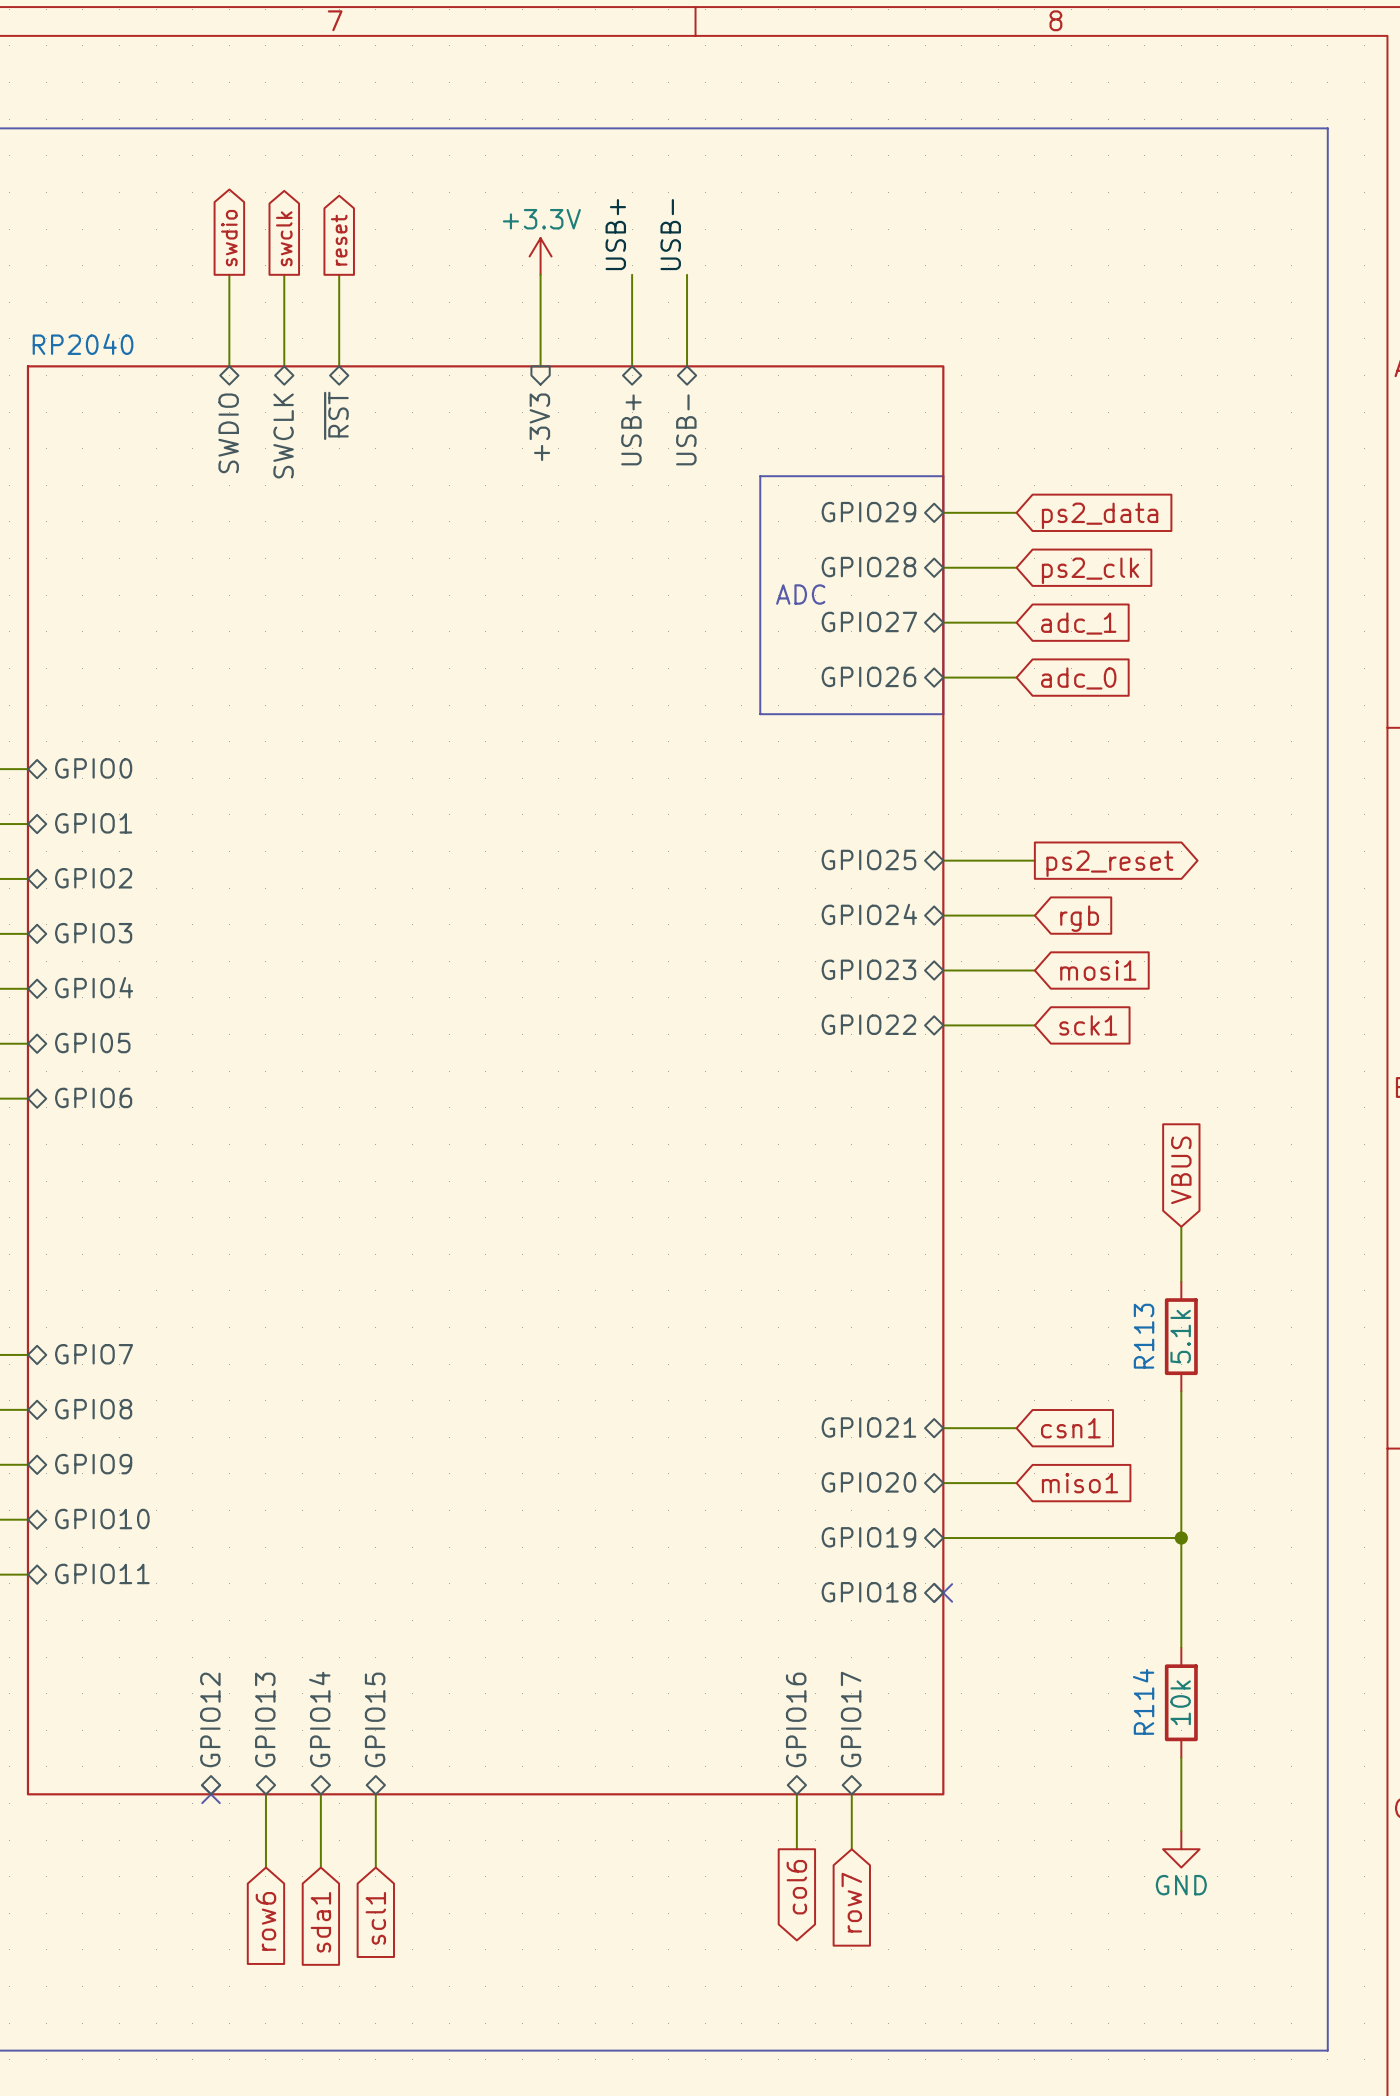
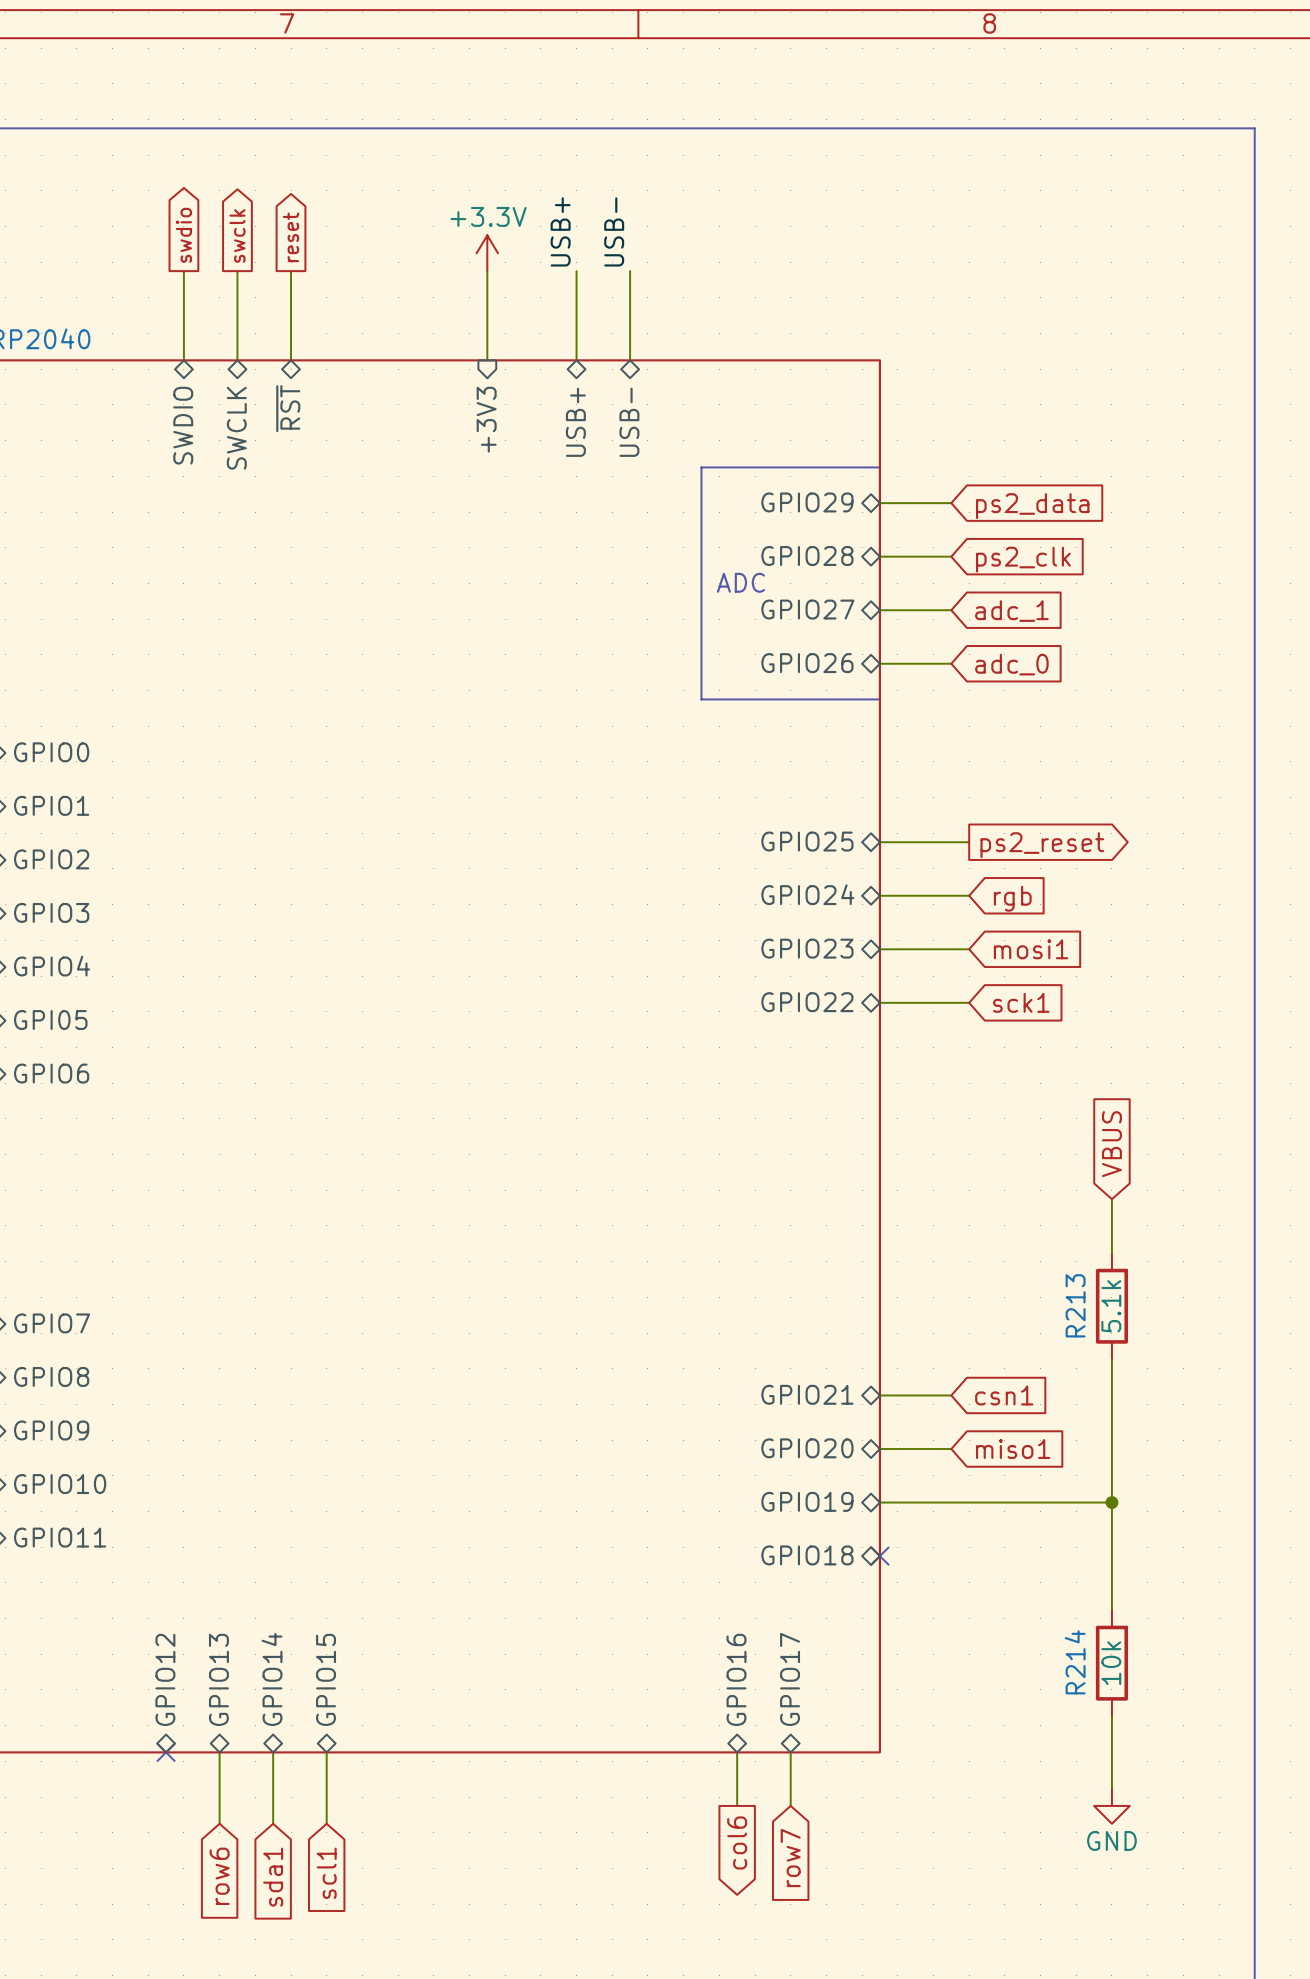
R113 name: R113 (1144, 1336) -> R213 (1075, 1305)
R114 name: R114 (1143, 1701) -> R214 (1075, 1662)

